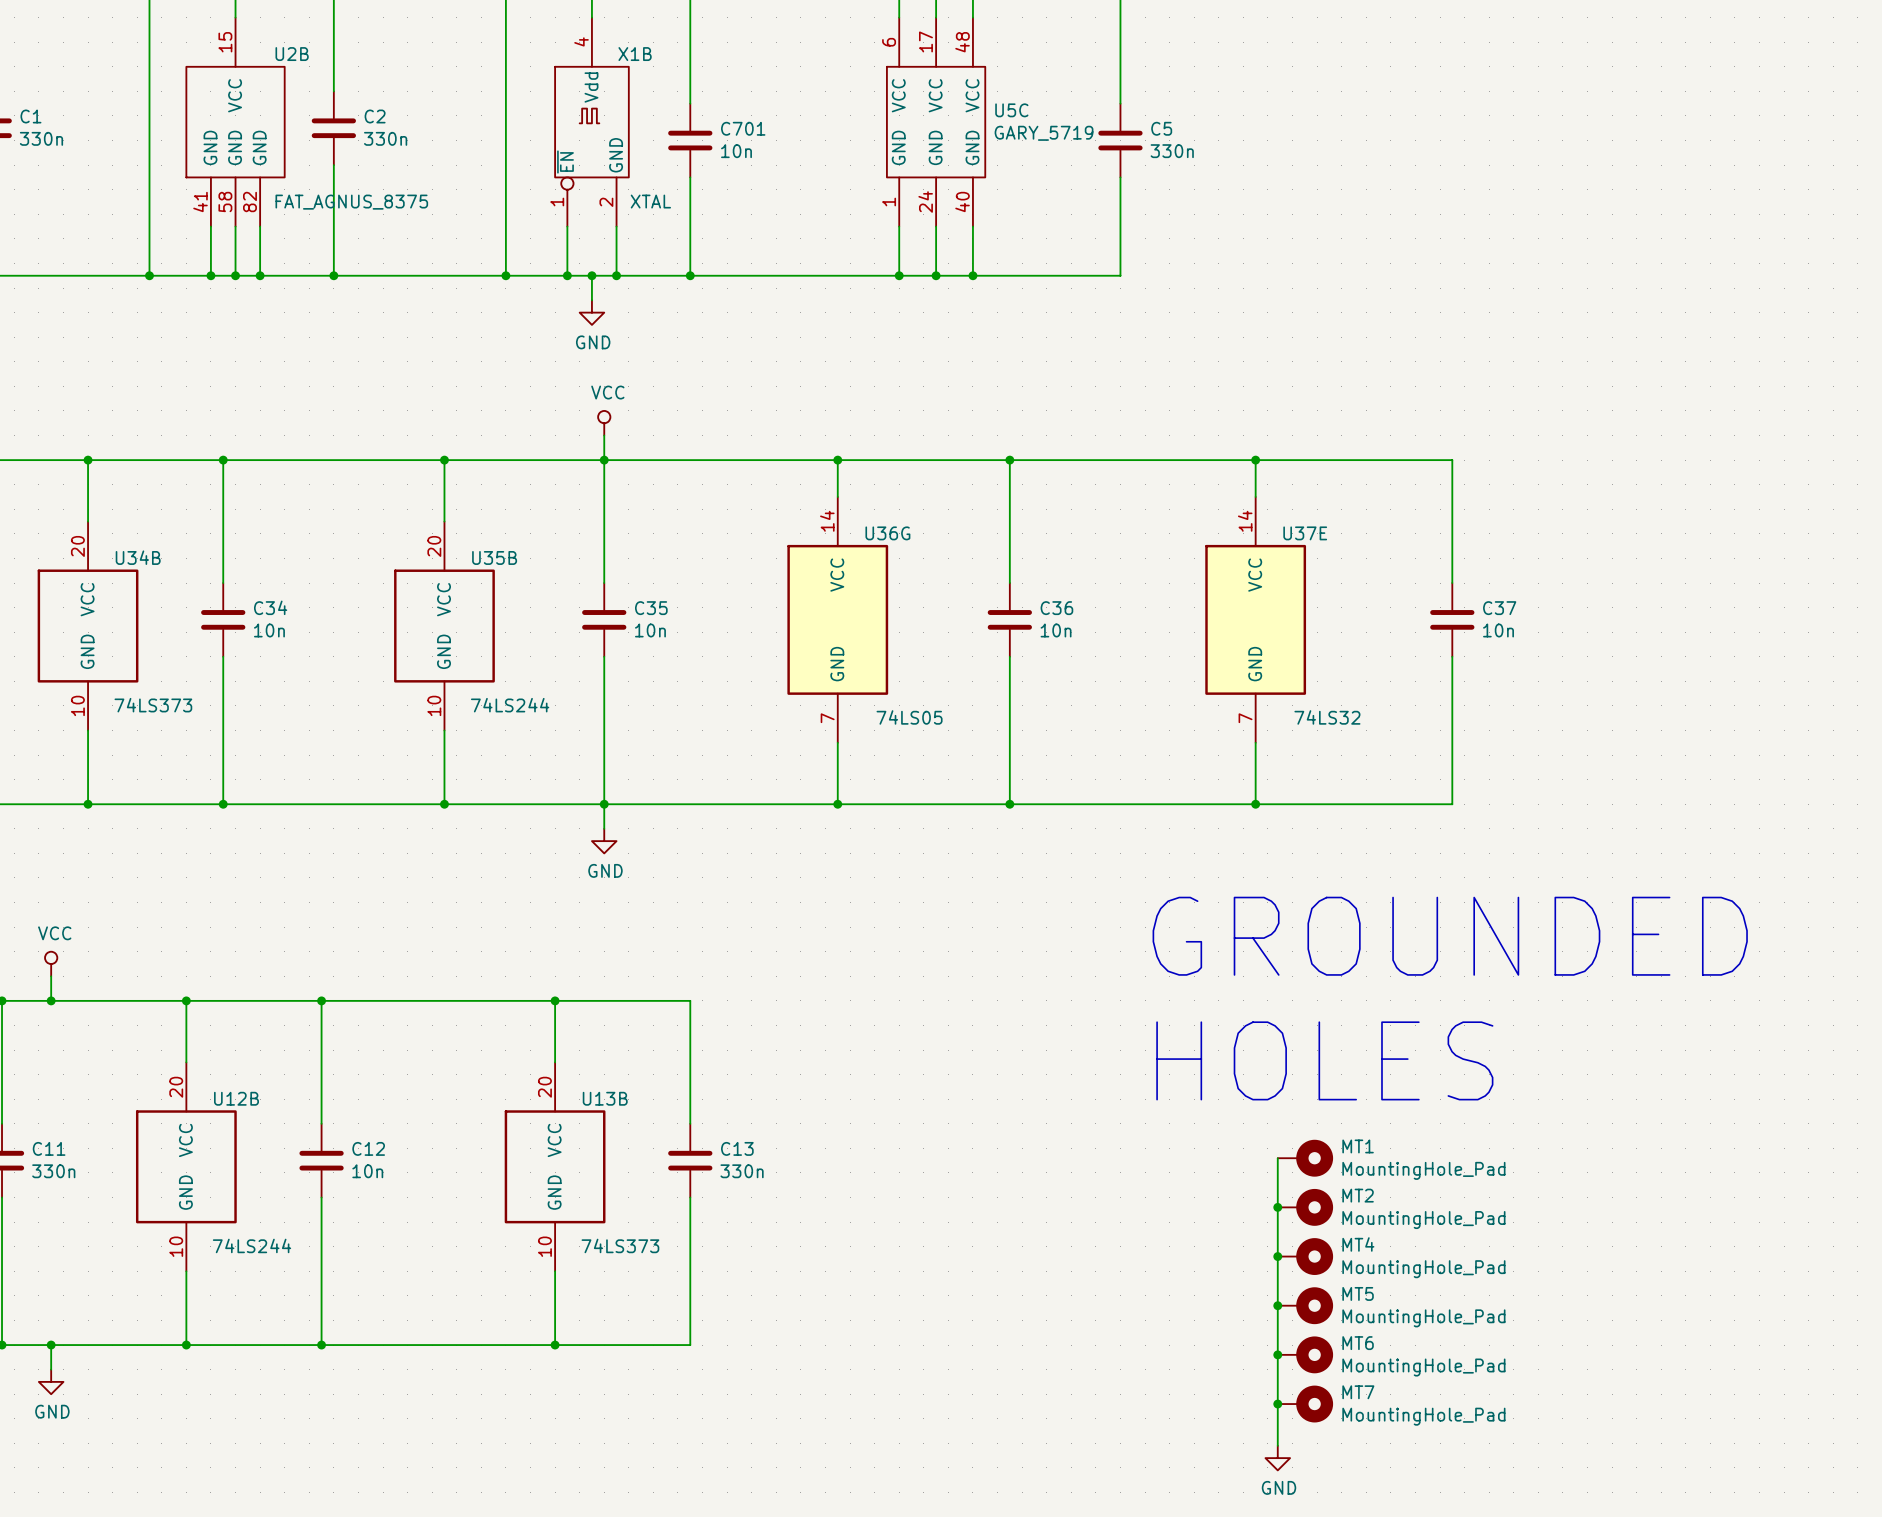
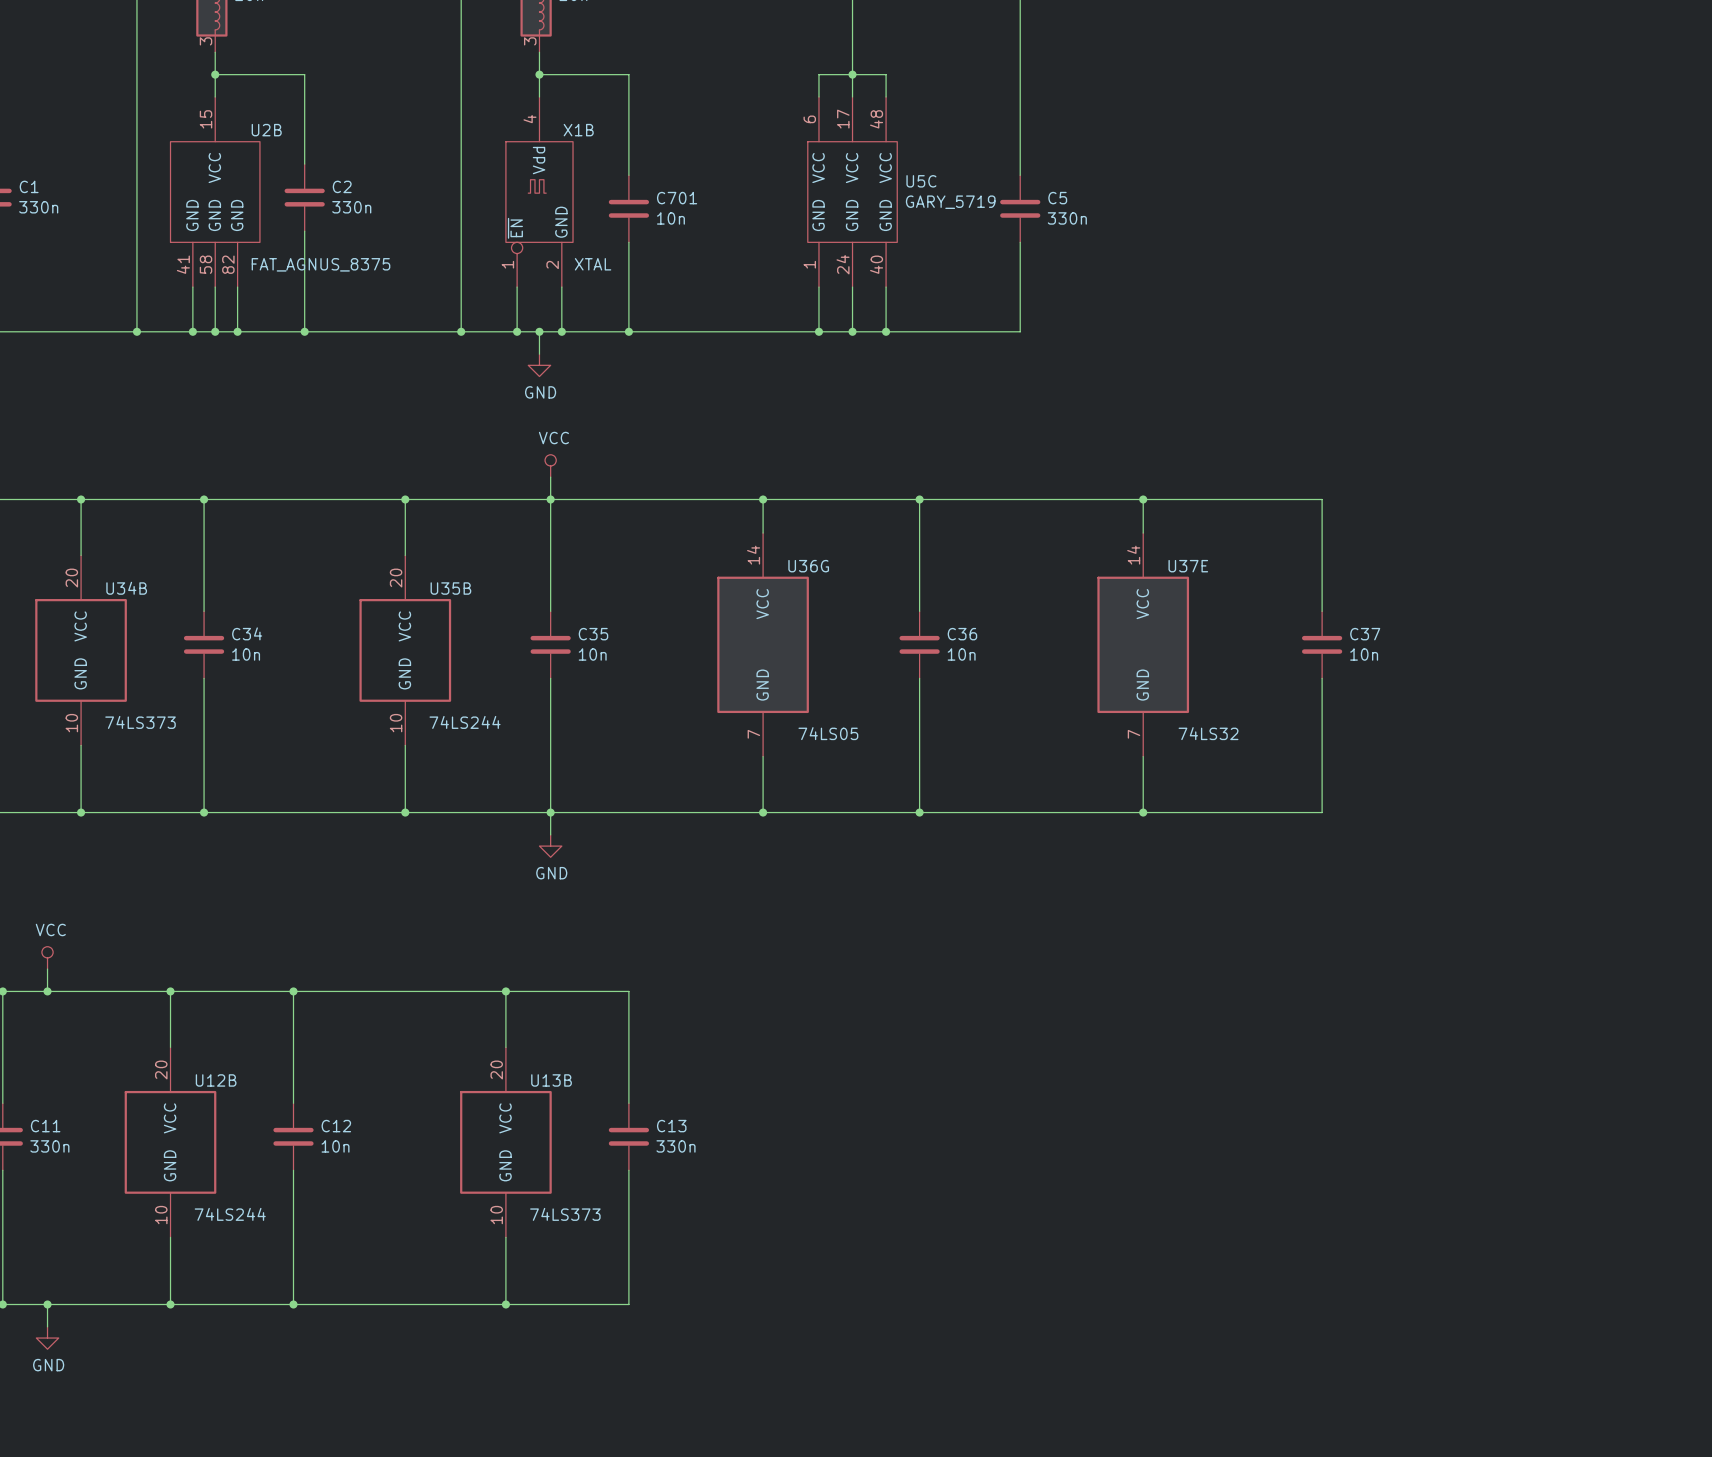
text: GROUNDED (1450, 936) -> none
text: HOLES (1324, 1060) -> none
wire: (1277, 1158) (1277, 1445) -> none
MT1: MountingHole_Pad (1305, 1158) -> none
junction: (1277, 1207) -> none
MT2: MountingHole_Pad (1305, 1207) -> none
junction: (1277, 1256) -> none
MT4: MountingHole_Pad (1305, 1256) -> none
junction: (1277, 1305) -> none
MT5: MountingHole_Pad (1305, 1305) -> none
junction: (1277, 1354) -> none
MT6: MountingHole_Pad (1305, 1354) -> none
junction: (1277, 1404) -> none
MT7: MountingHole_Pad (1305, 1404) -> none
power symbol: GND (1277, 1458) -> none

